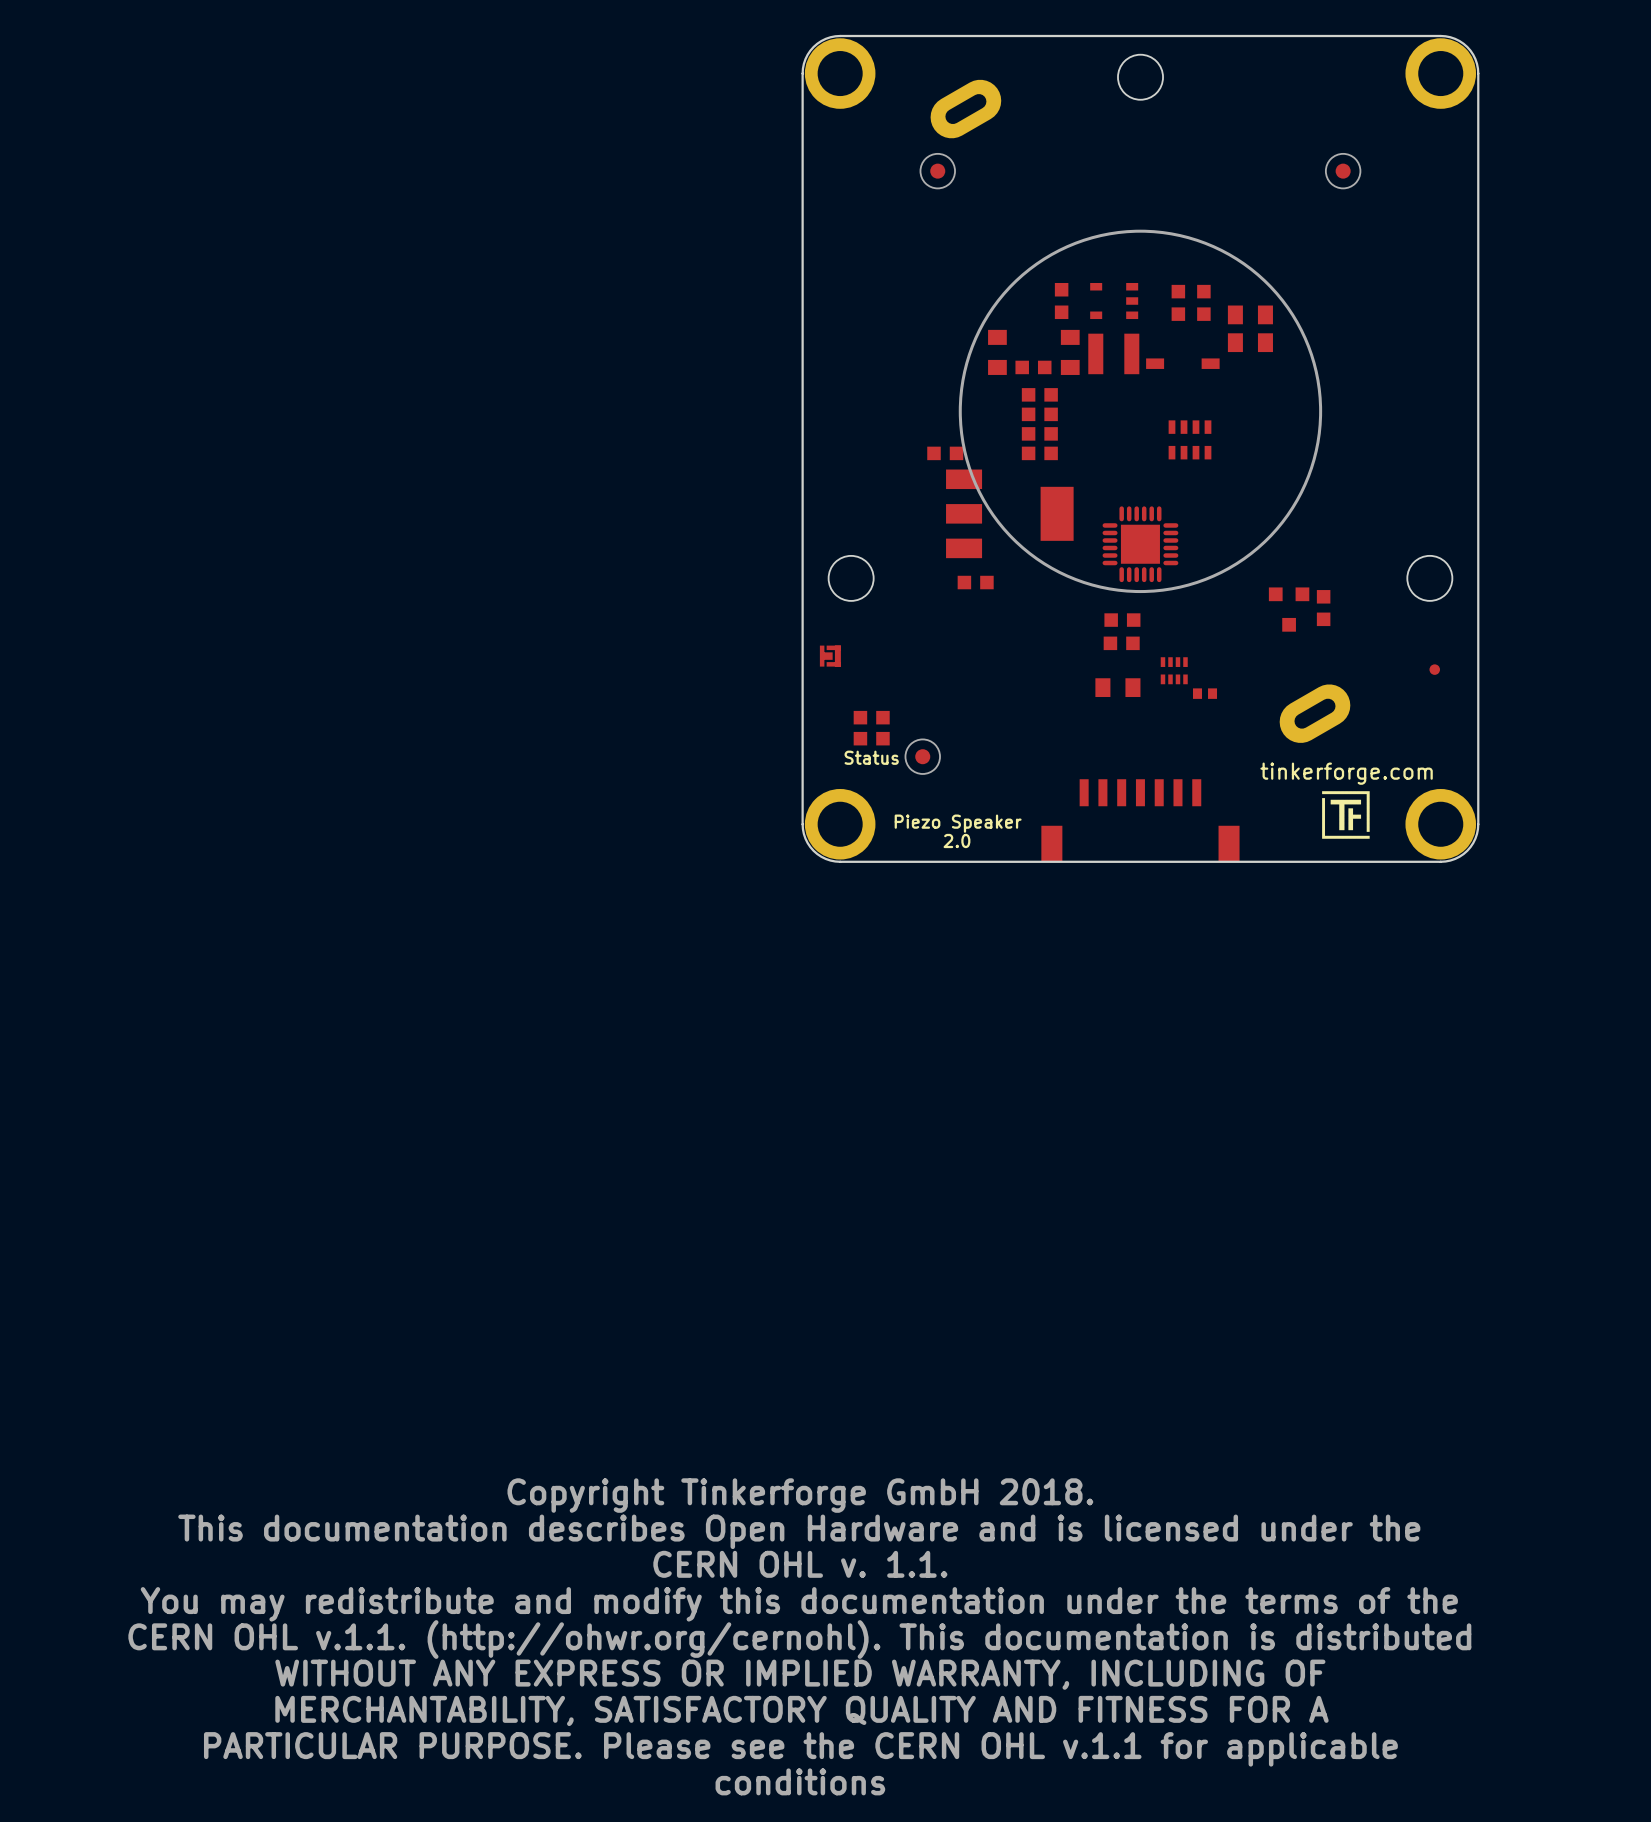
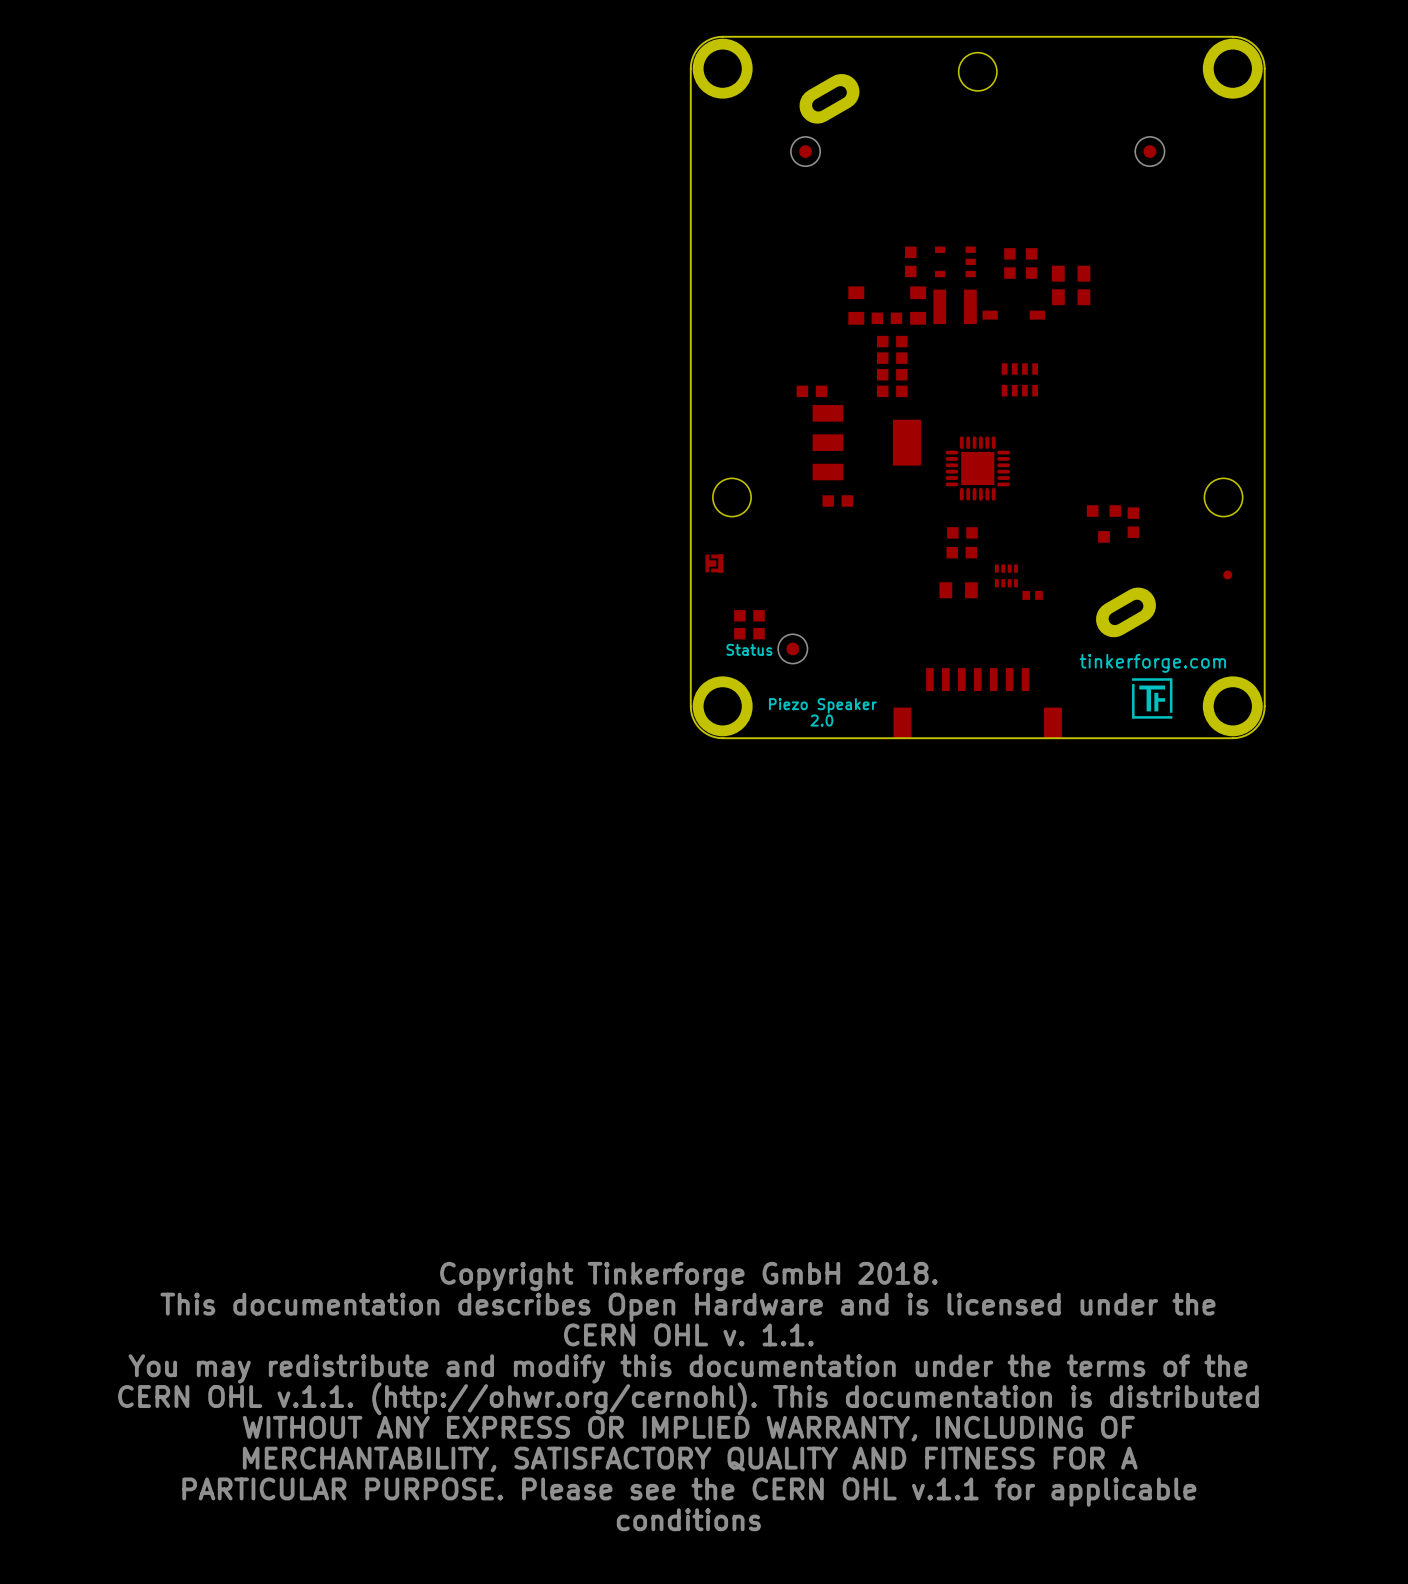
drawing: [958, 229, 1323, 594] -> none

